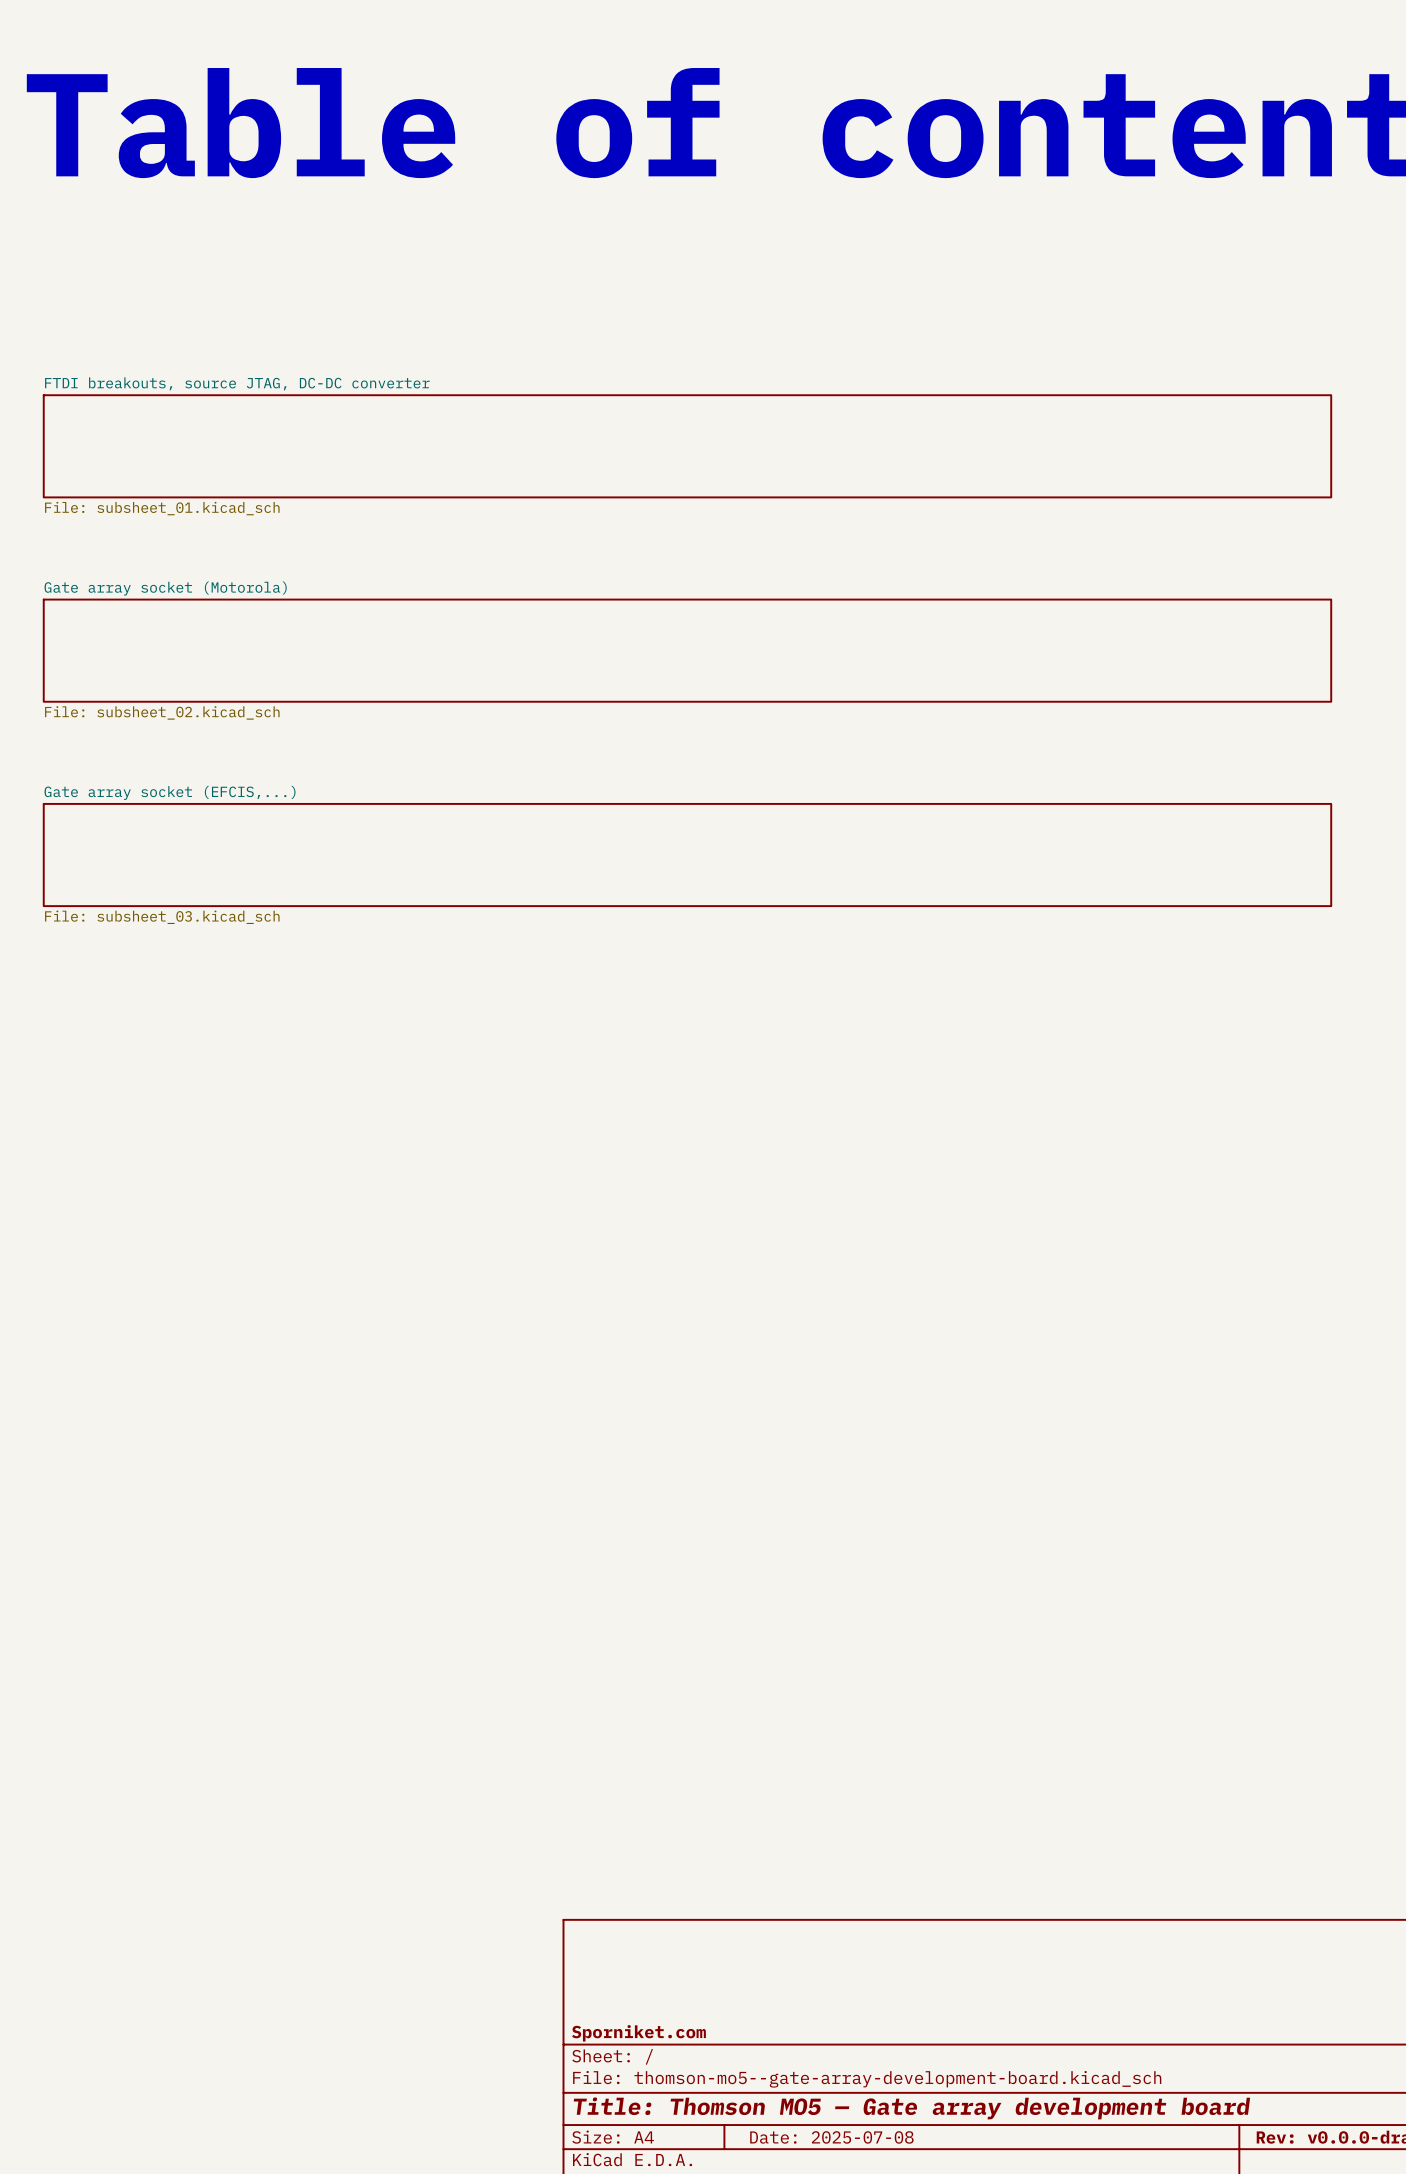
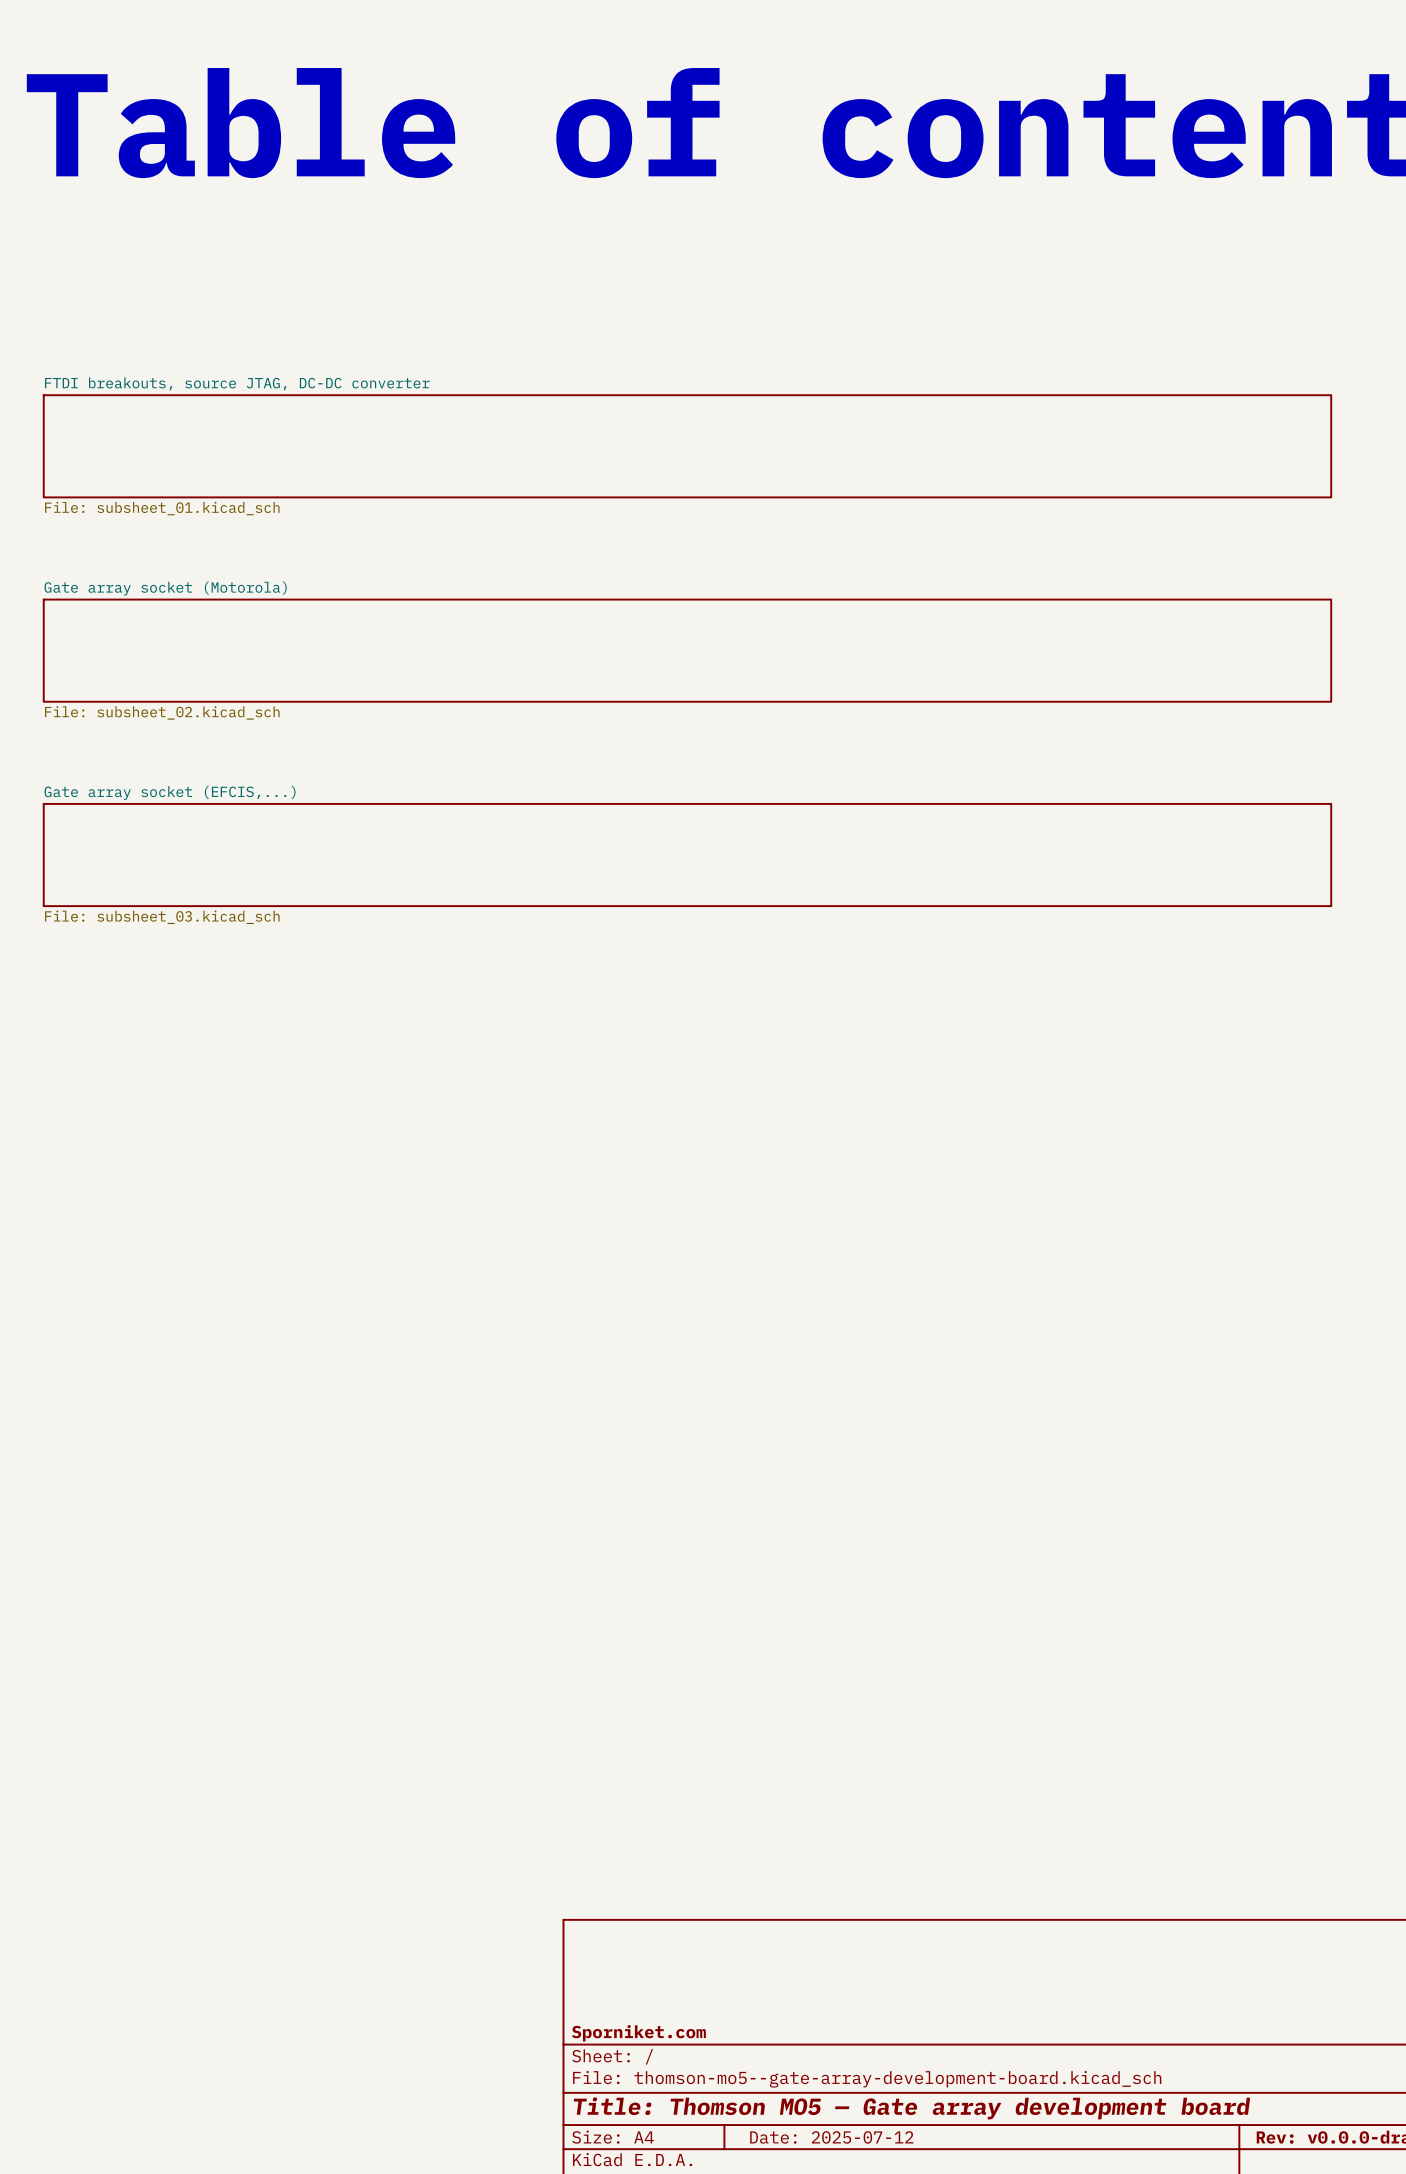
title block: Date: 2025-07-08 (831, 2137) -> Date: 2025-07-12 (831, 2137)

